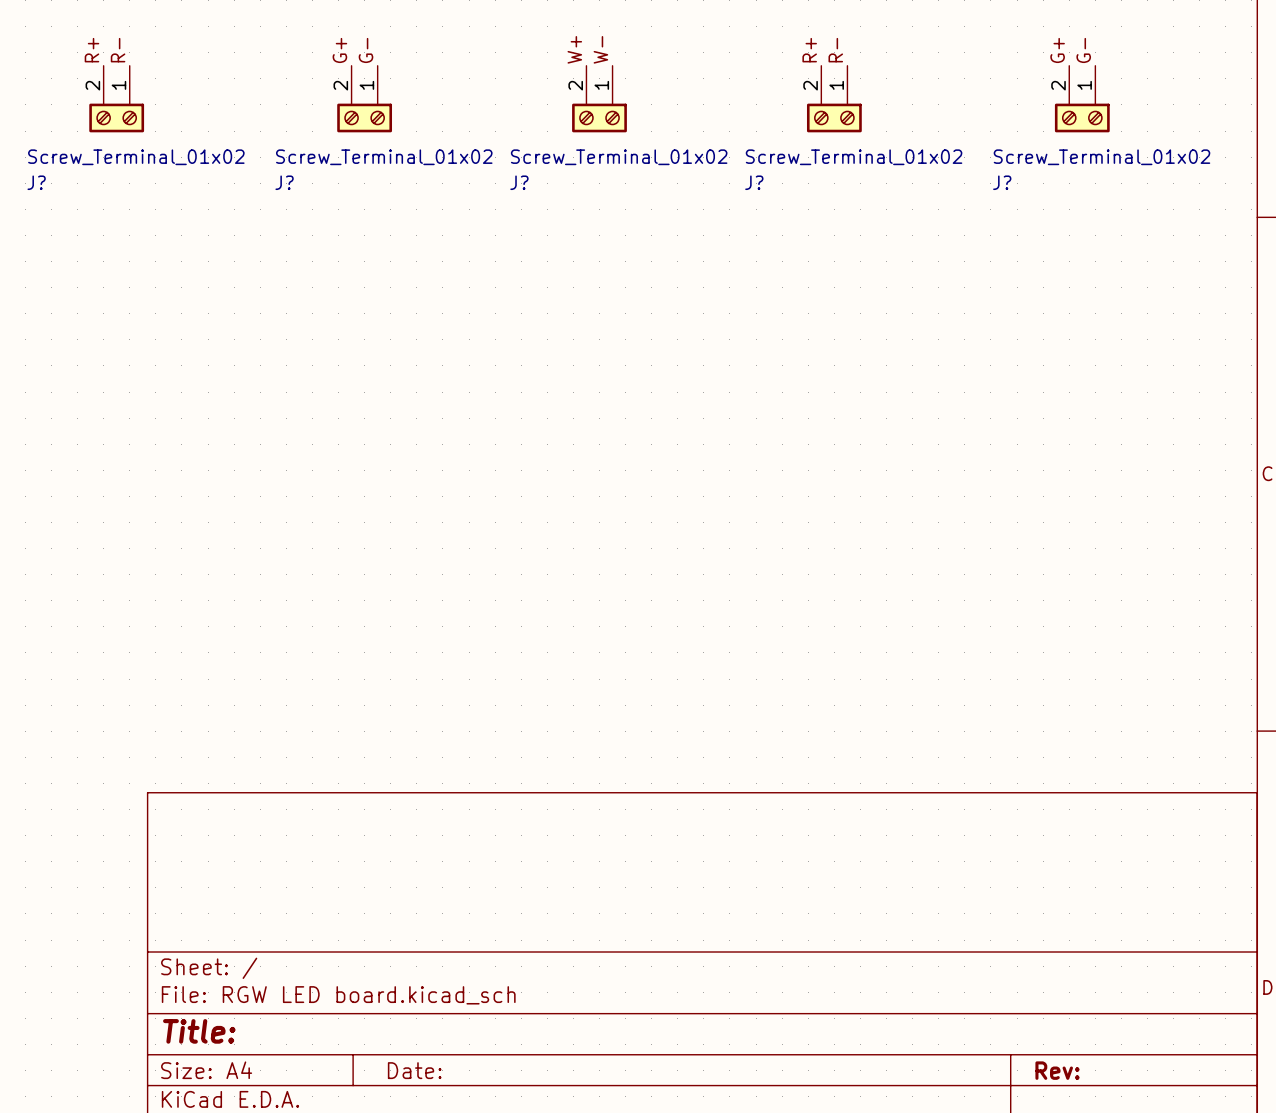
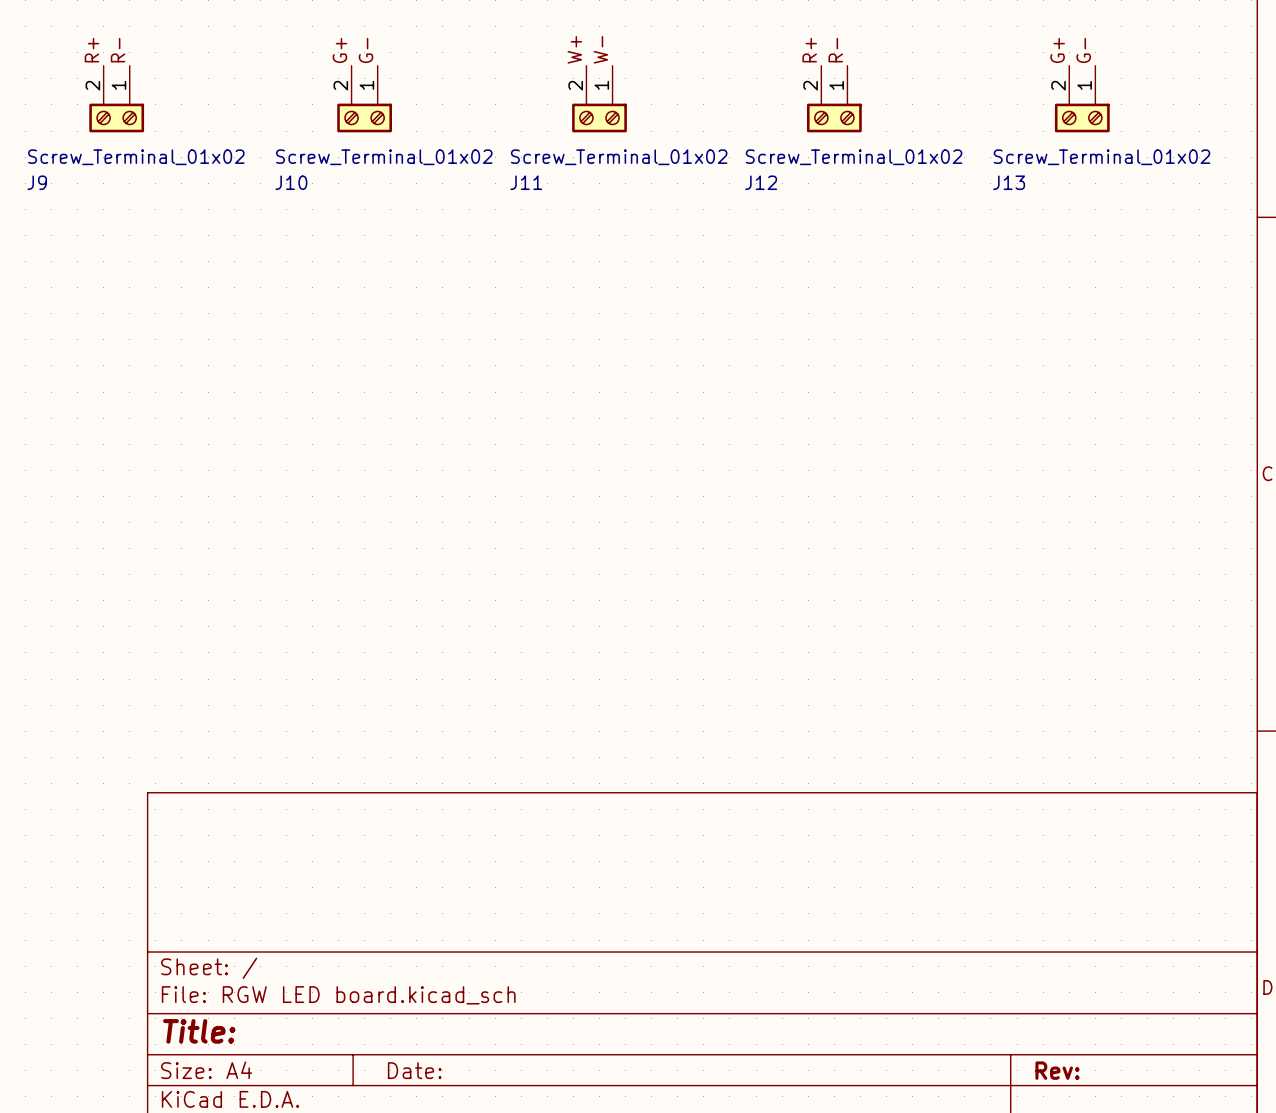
J? name: J? (36, 182) -> J9 (37, 182)
J? name: J? (284, 182) -> J10 (291, 182)
J? name: J? (519, 182) -> J11 (526, 182)
J? name: J? (754, 182) -> J12 (761, 182)
J? name: J? (1002, 182) -> J13 (1009, 182)

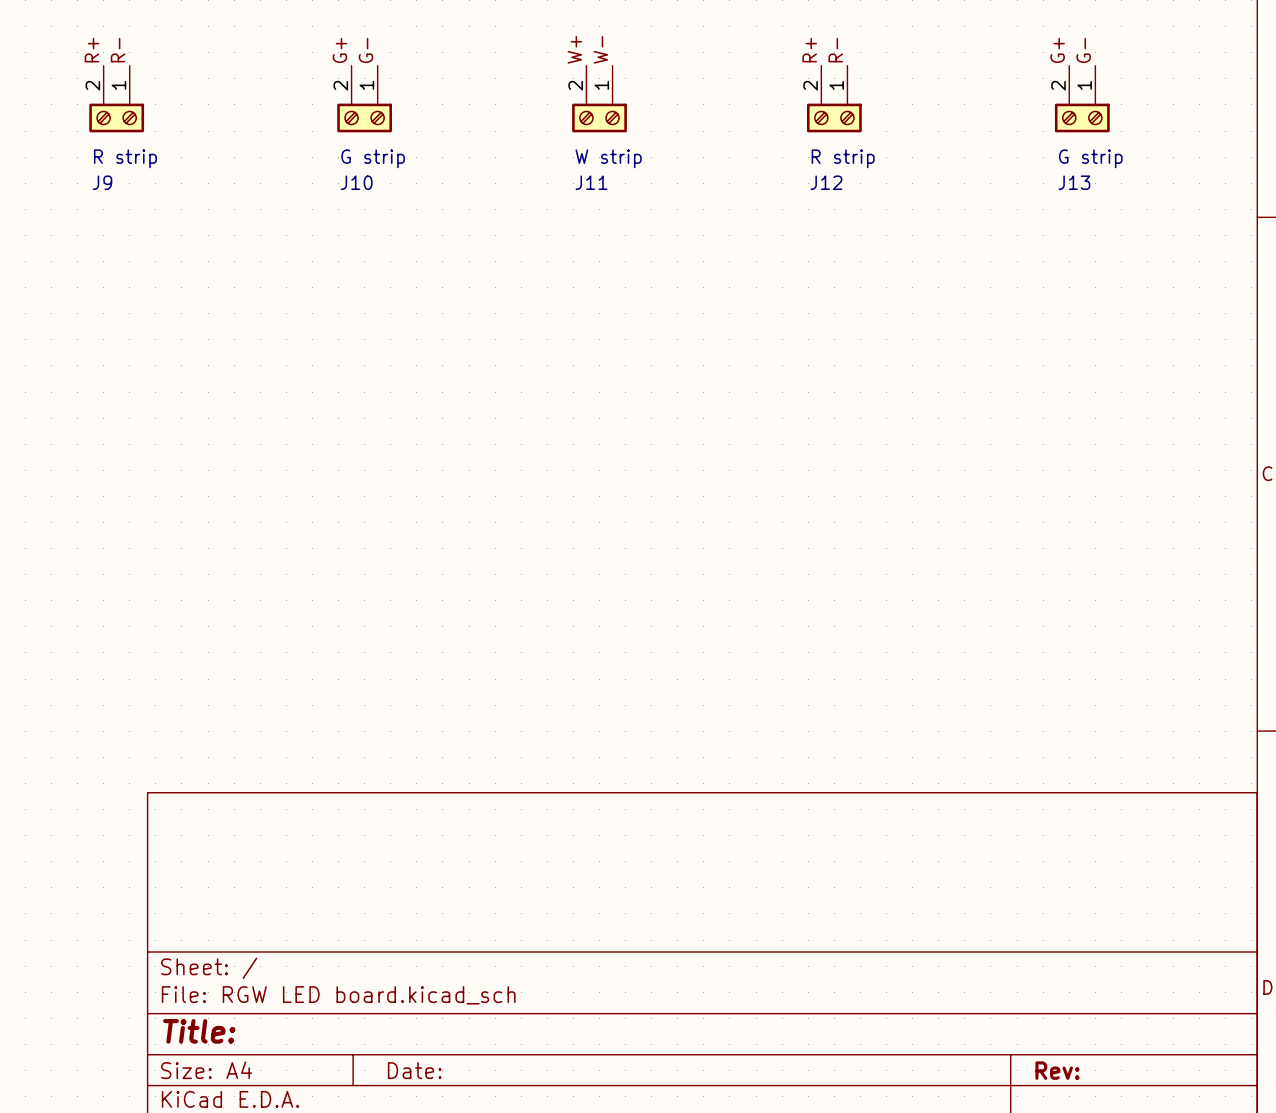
J9 value: Screw_Terminal_01x02 (136, 157) -> R strip (125, 158)
J10 value: Screw_Terminal_01x02 (384, 157) -> G strip (373, 158)
J11 value: Screw_Terminal_01x02 (619, 157) -> W strip (608, 158)
J12 value: Screw_Terminal_01x02 (854, 157) -> R strip (843, 158)
J13 value: Screw_Terminal_01x02 (1101, 157) -> G strip (1090, 158)
J9 name position: J9 (37, 182) -> J9 (102, 182)
J10 name position: J10 (291, 182) -> J10 (356, 182)
J11 name position: J11 (526, 182) -> J11 (591, 182)
J12 name position: J12 (761, 182) -> J12 (826, 182)
J13 name position: J13 (1009, 182) -> J13 (1074, 182)

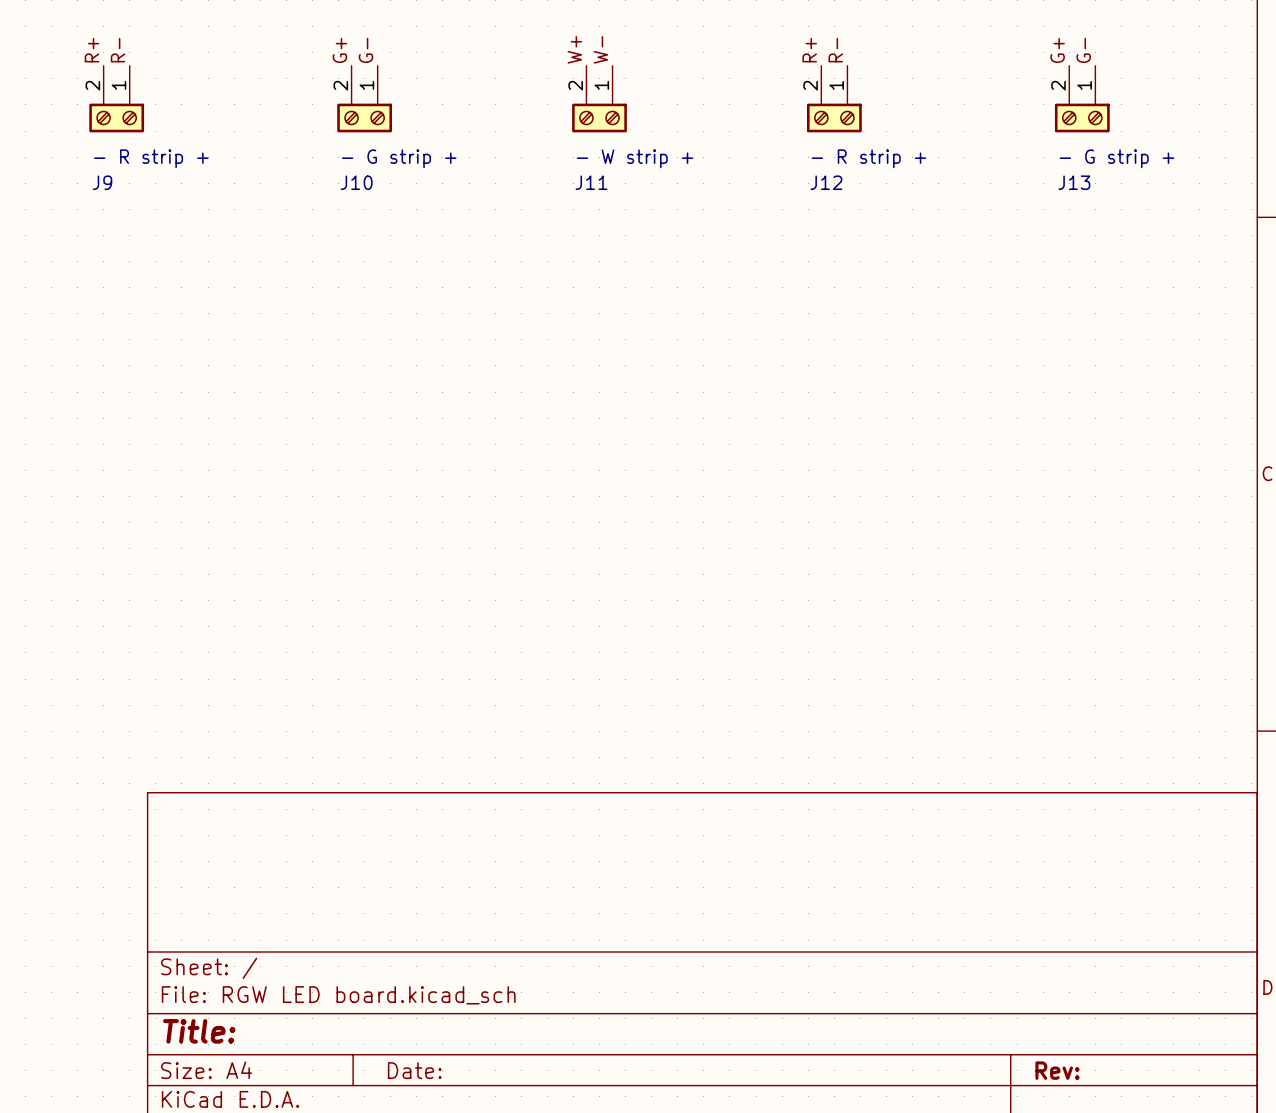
J9 value: R strip (125, 158) -> - R strip + (151, 158)
J10 value: G strip (373, 158) -> - G strip + (399, 158)
J11 value: W strip (608, 158) -> - W strip + (635, 158)
J12 value: R strip (843, 158) -> - R strip + (868, 158)
J13 value: G strip (1090, 158) -> - G strip + (1116, 158)

